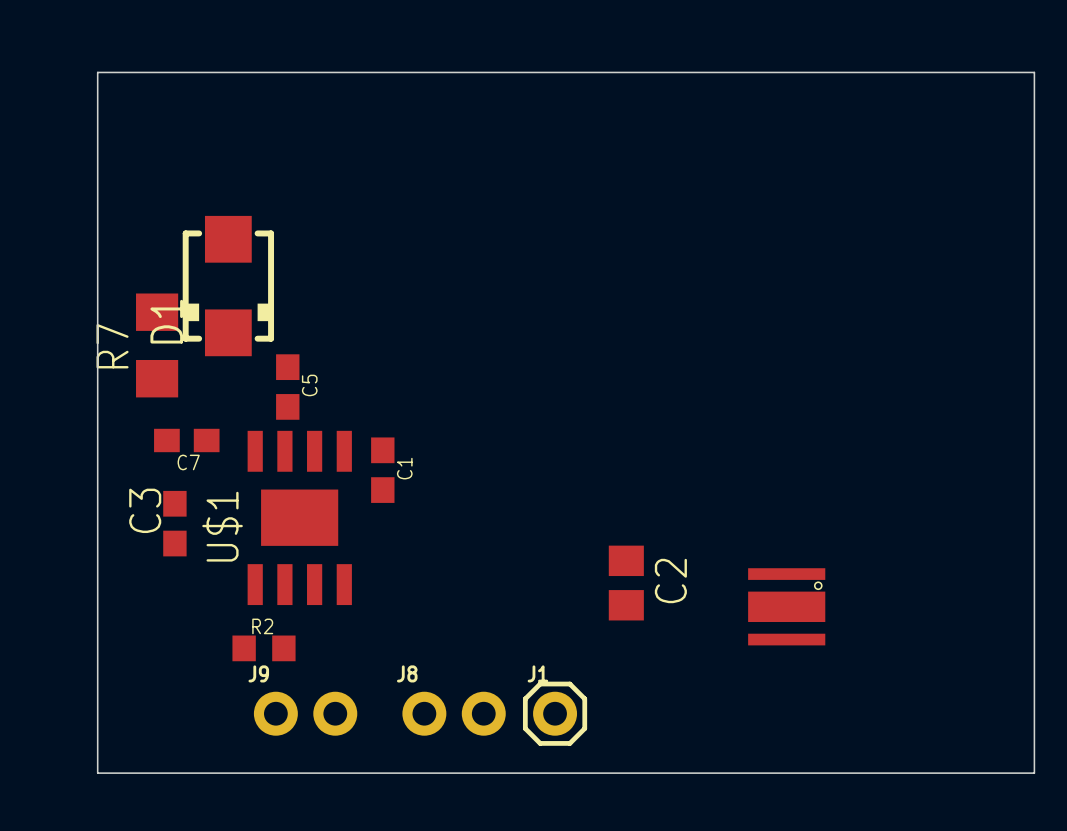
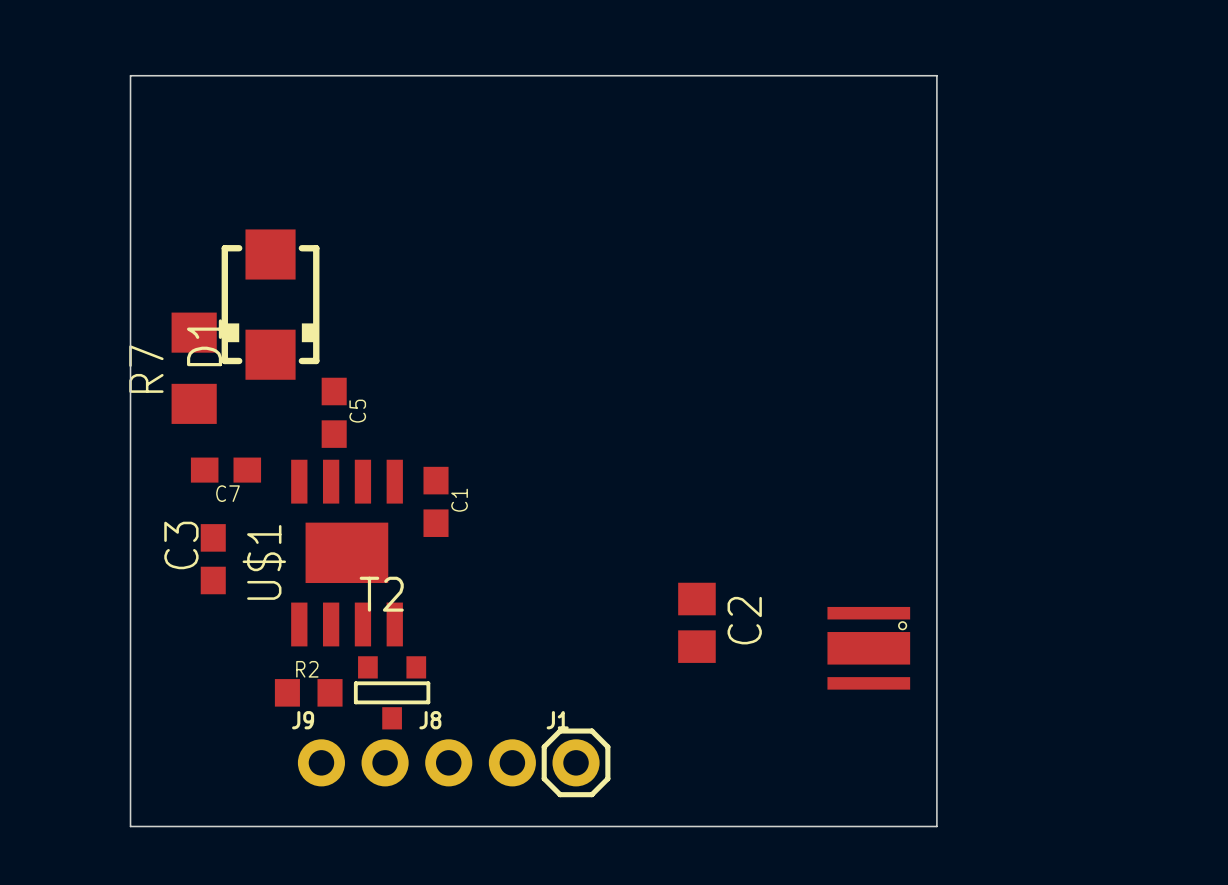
board edge: (850, 72) (1034, 72) (1034, 773) (850, 773) -> (936, 75) (936, 826)
T2: none -> (392, 692)
J8 position: (454, 713) -> (480, 762)
J1 position: (555, 713) -> (576, 762)

